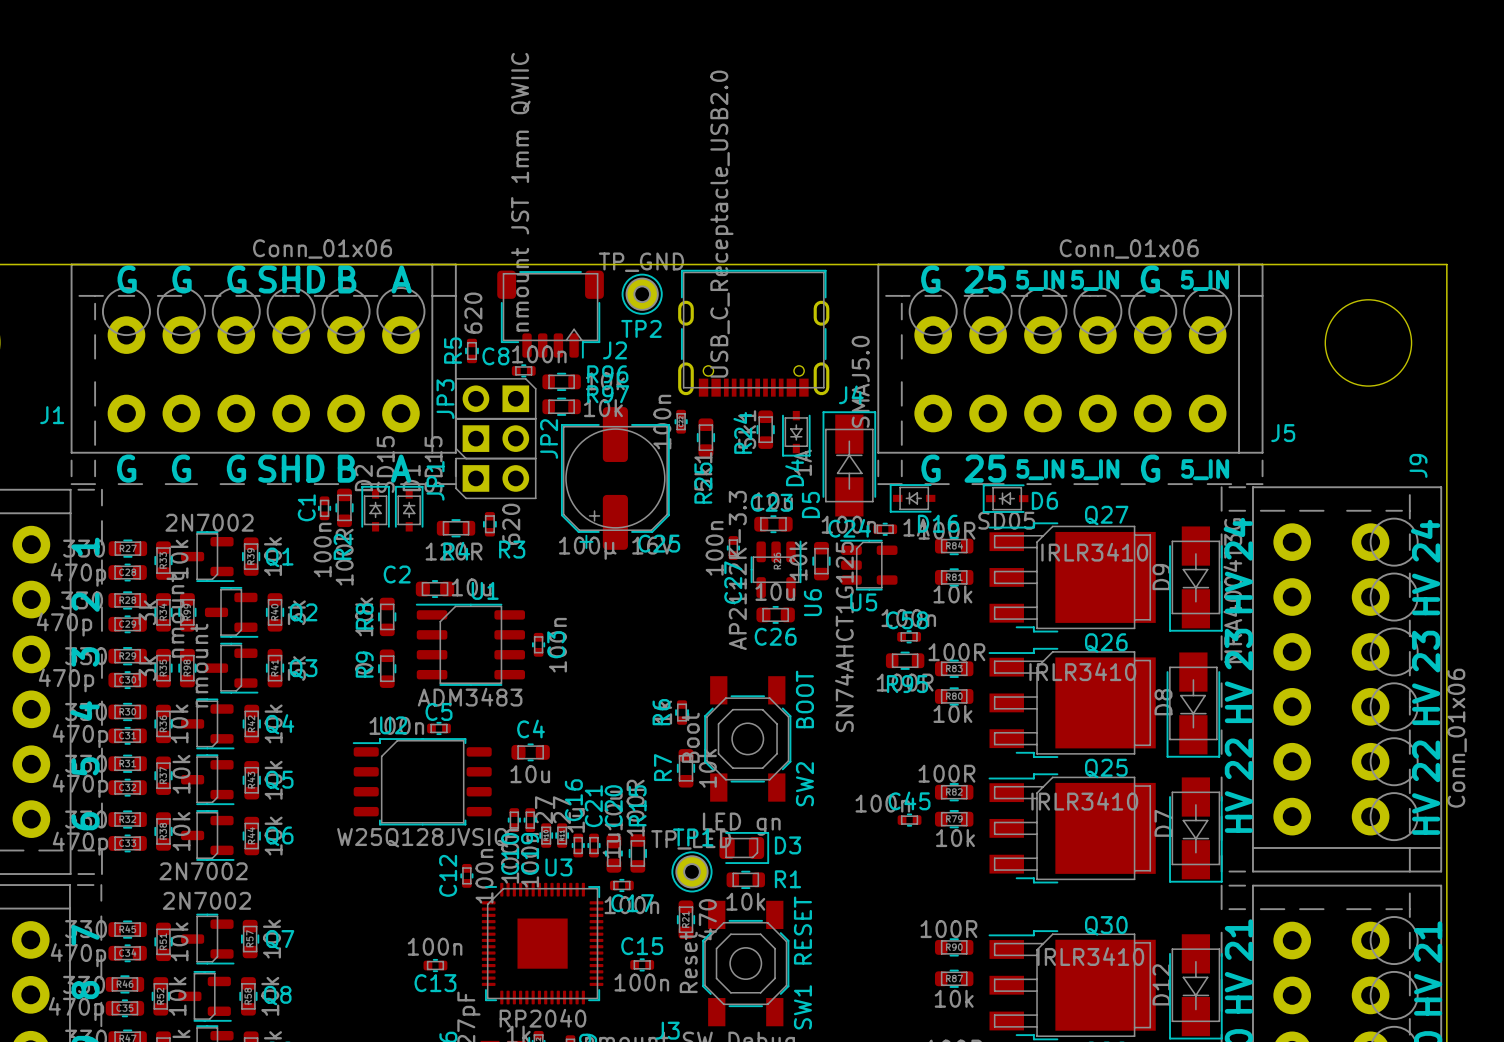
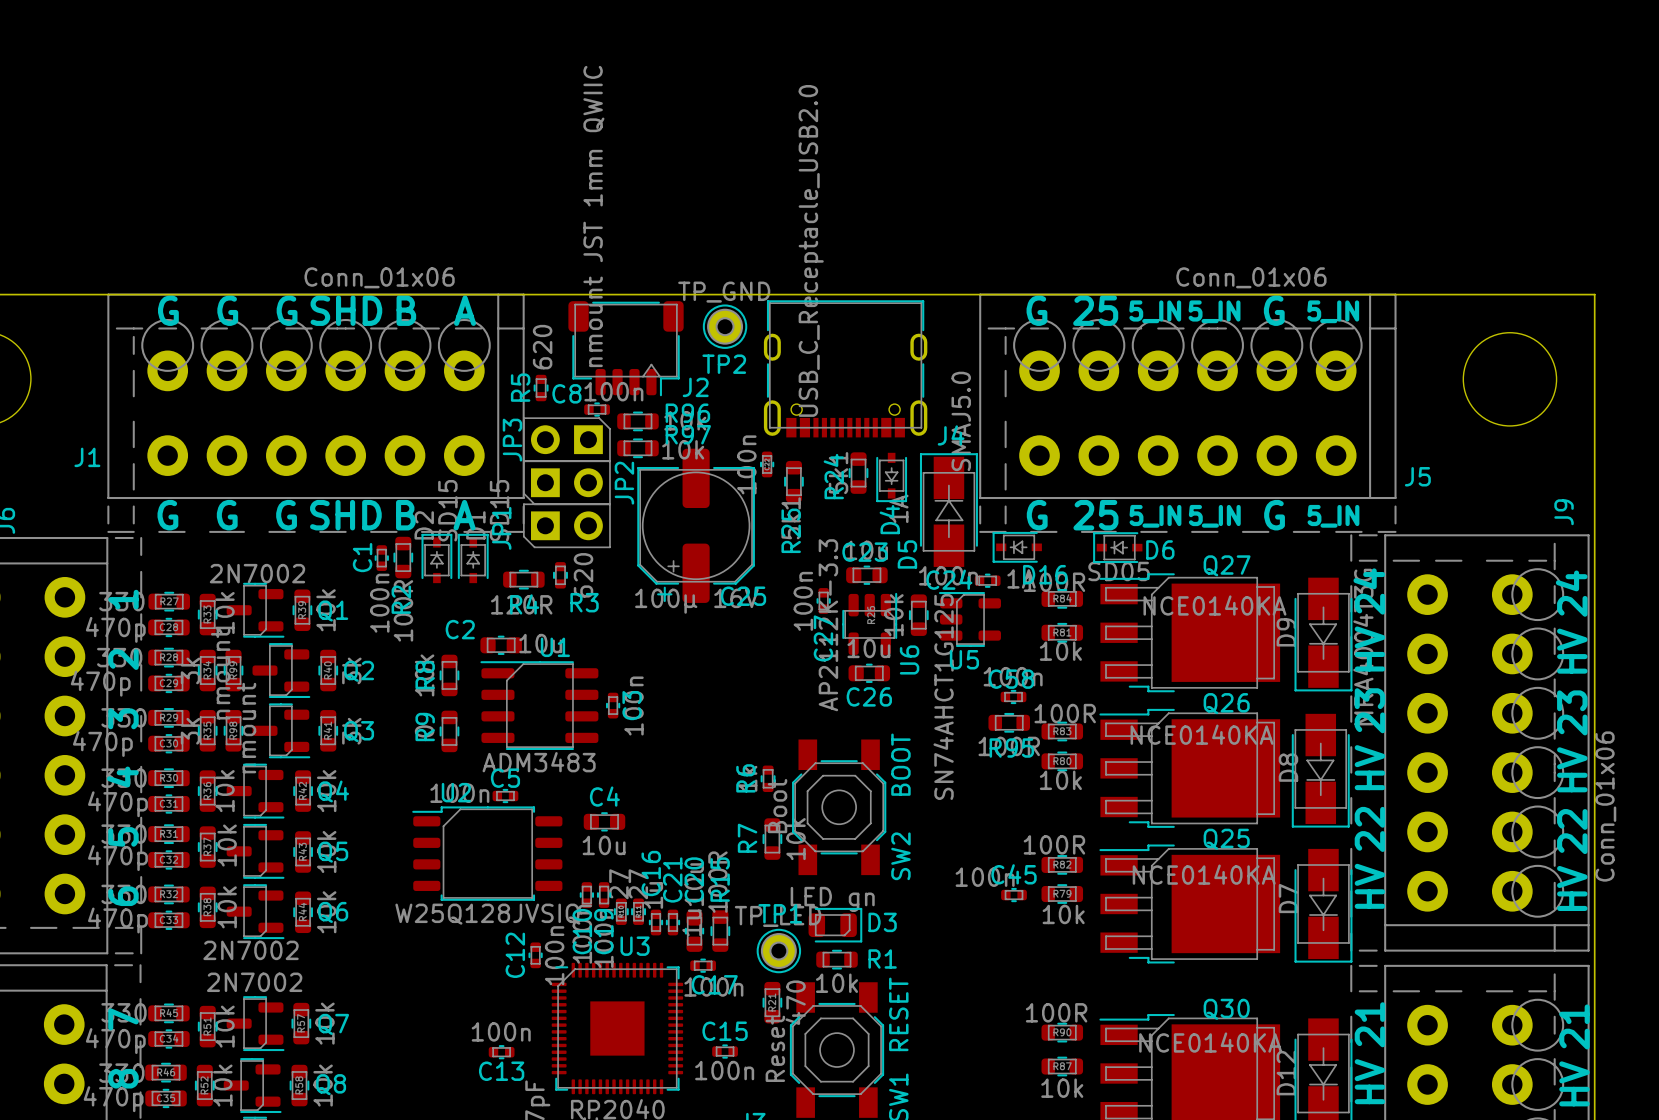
Q27 value: IRLR3410 (1094, 552) -> NCE0140KA (1214, 605)
Q26 value: IRLR3410 (1082, 671) -> NCE0140KA (1202, 734)
Q25 value: IRLR3410 (1084, 801) -> NCE0140KA (1204, 874)
Q30 value: IRLR3410 (1090, 956) -> NCE0140KA (1210, 1042)

